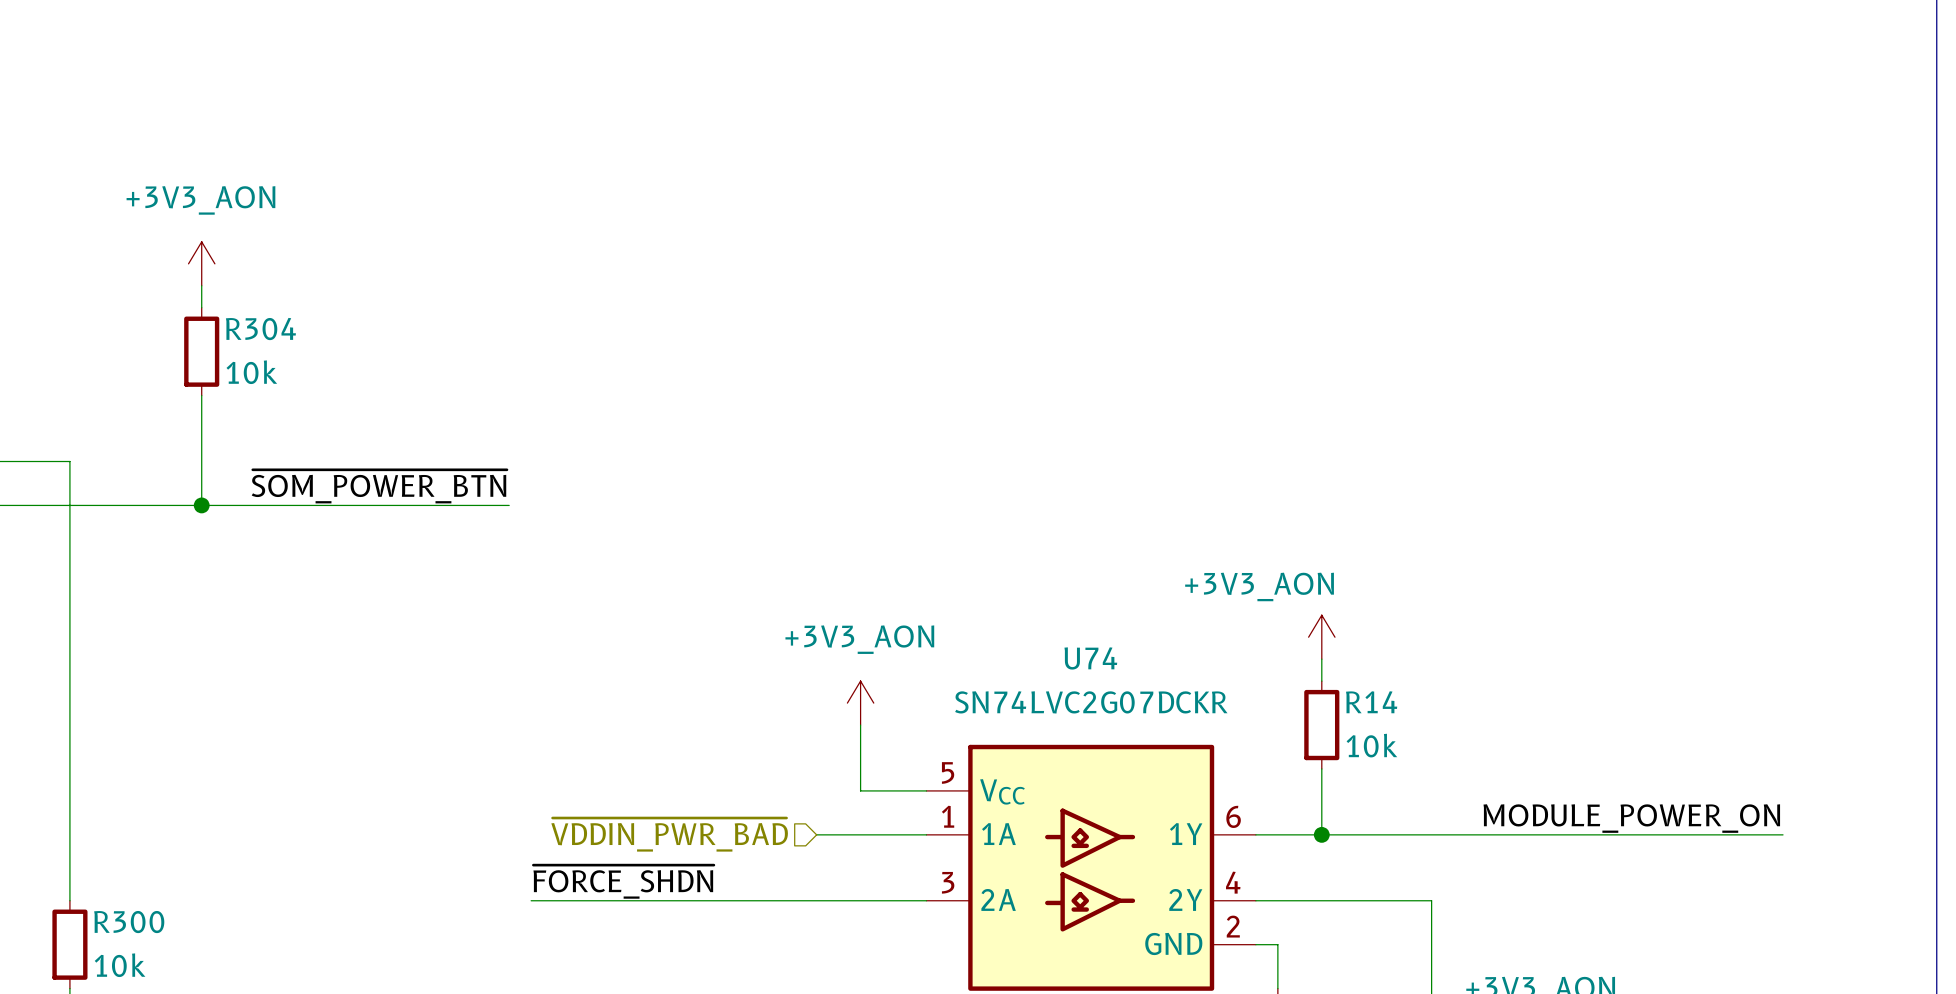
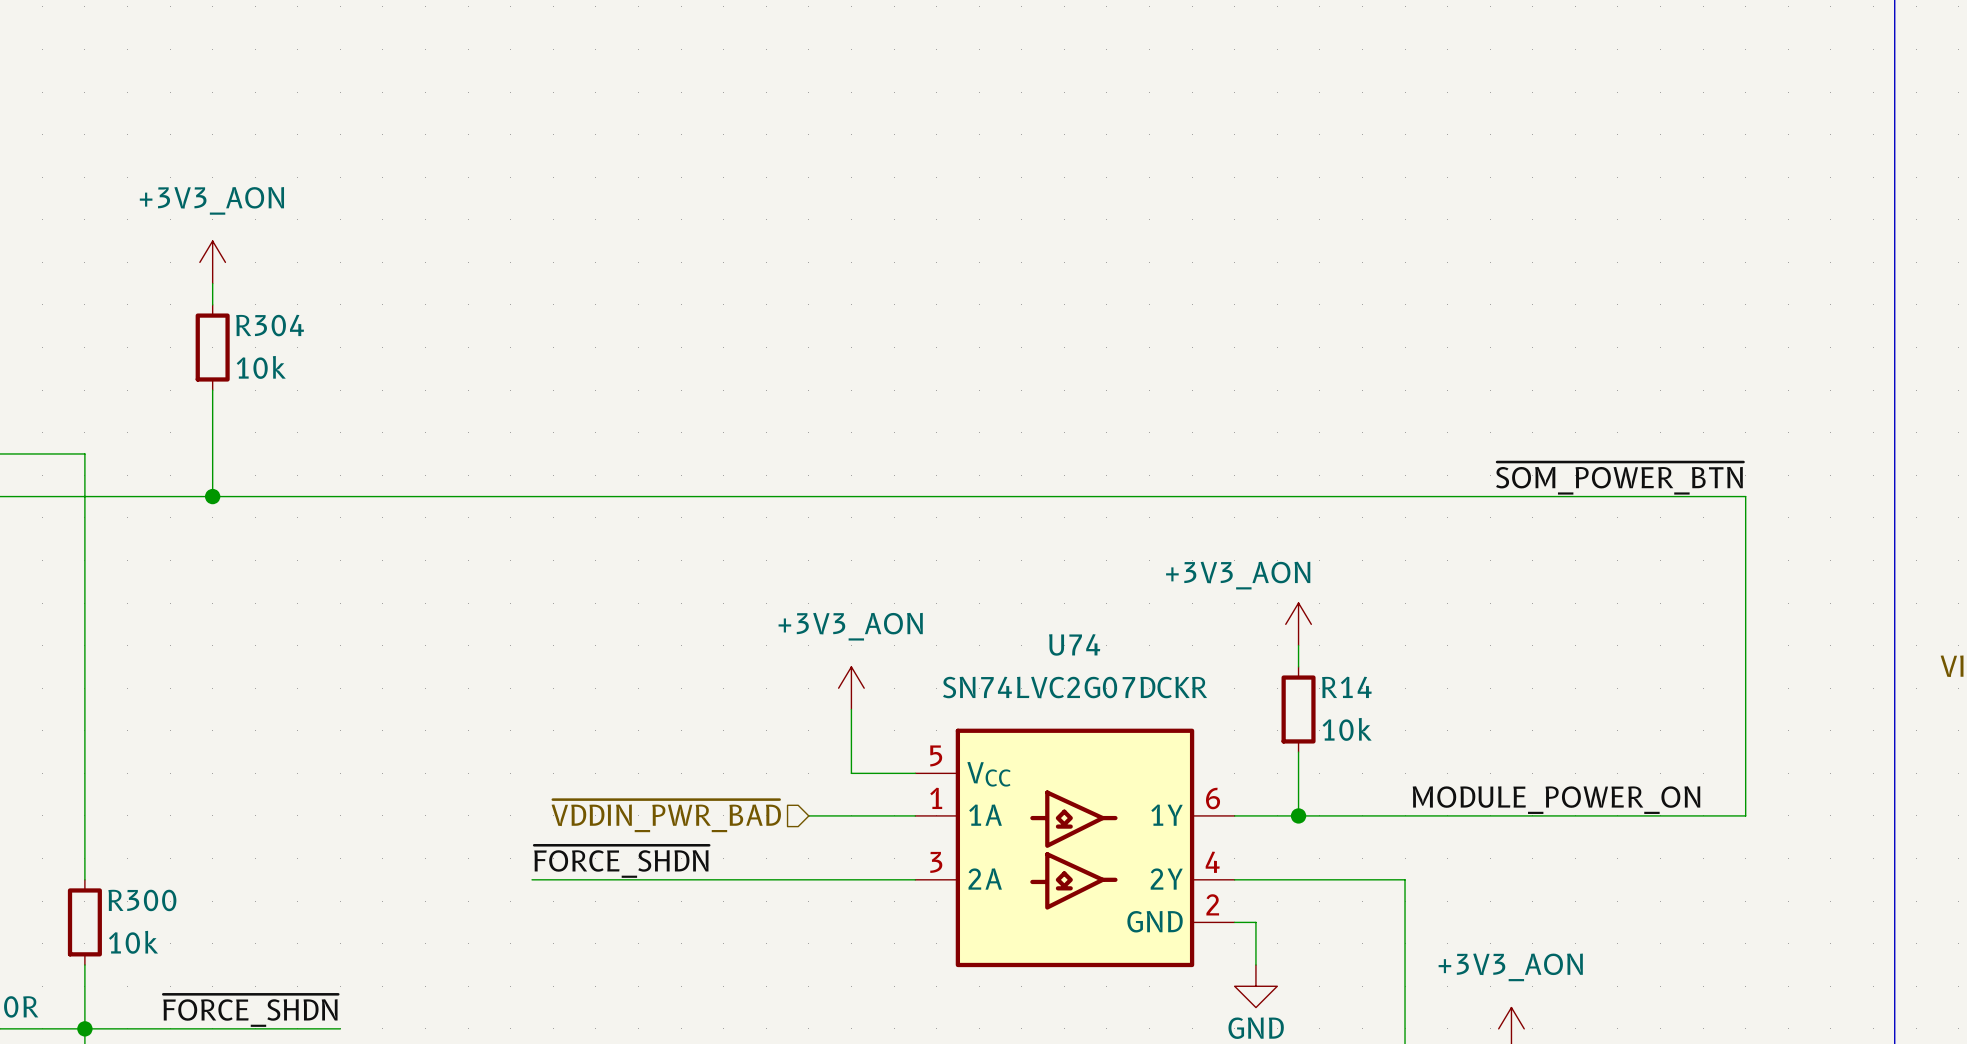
label: ~{SOM_POWER_BTN} (379, 486) -> none
label: none -> ~{SOM_POWER_BTN} (1619, 478)
wire: none -> (510, 496) (1745, 496) (1745, 815)
label position: MODULE_POWER_ON (1631, 818) -> MODULE_POWER_ON (1556, 800)

